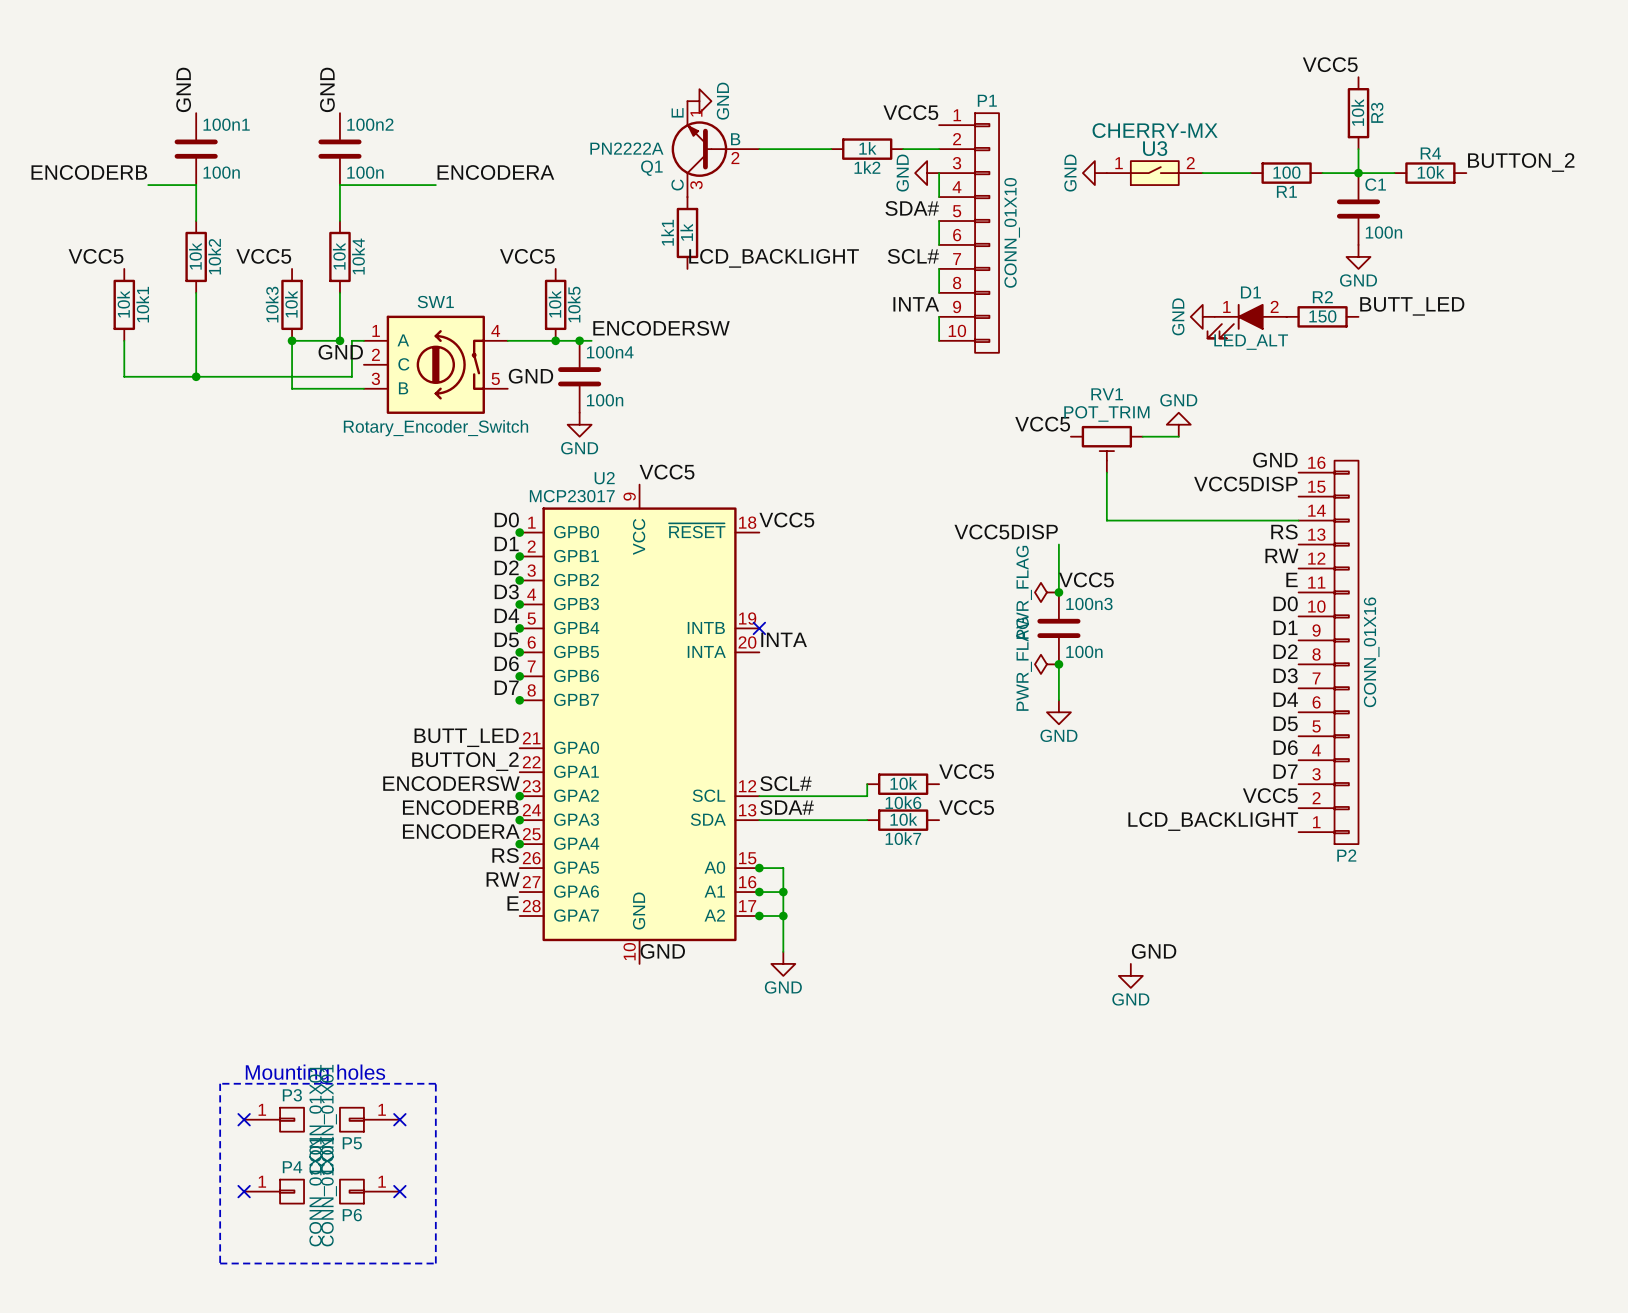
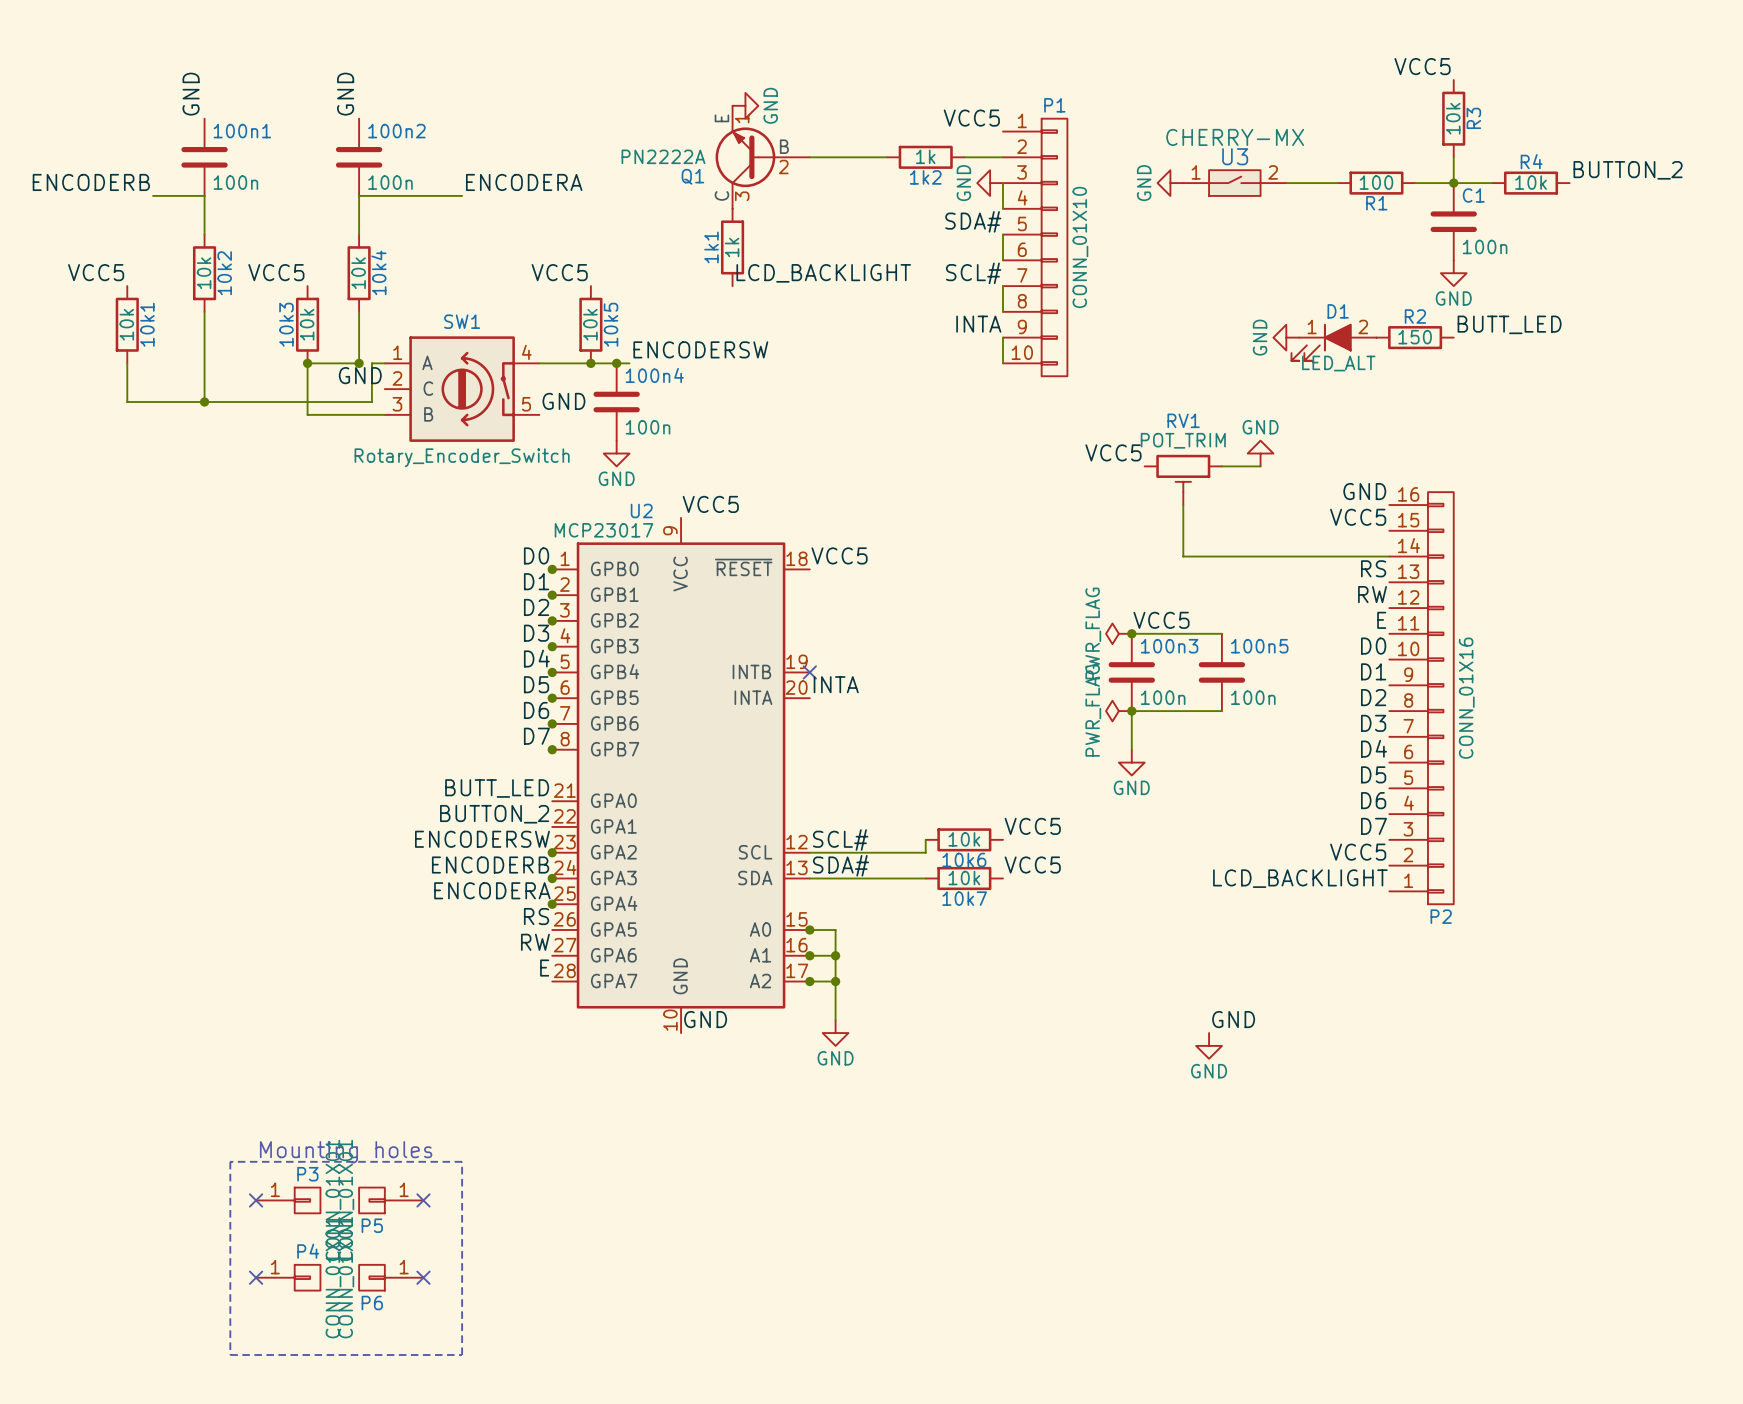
label: VCC5DISP (1245, 484) -> VCC5 (1358, 517)
label: VCC5DISP (1006, 531) -> none
wire: (1058, 544) (1058, 592) -> (1221, 633) (1131, 633)
100n5: none -> 100n (1221, 672)
wire: none -> (1131, 711) (1221, 711)

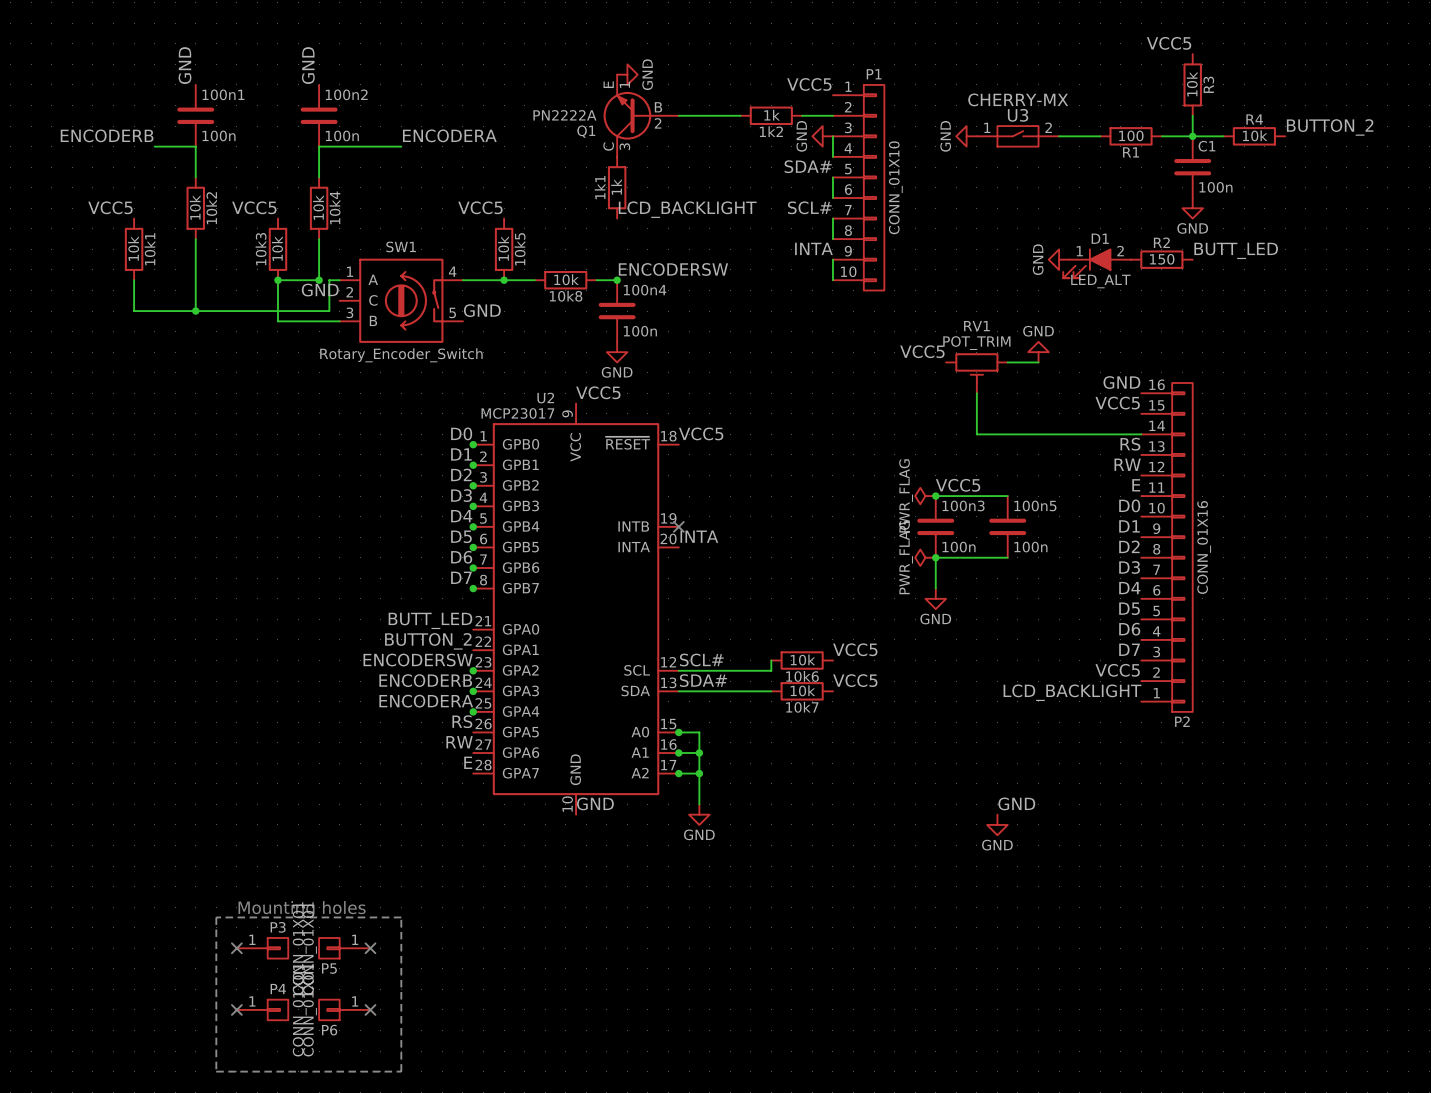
label position: ENCODERSW (700, 349) -> ENCODERSW (673, 269)
junction: (616, 363) -> none
10k8: none -> 10k (565, 280)
wire: none -> (596, 280) (617, 280)
junction: none -> (617, 280)
100n4 position: (616, 402) -> (617, 311)
power symbol position: GND (616, 453) -> GND (617, 352)

